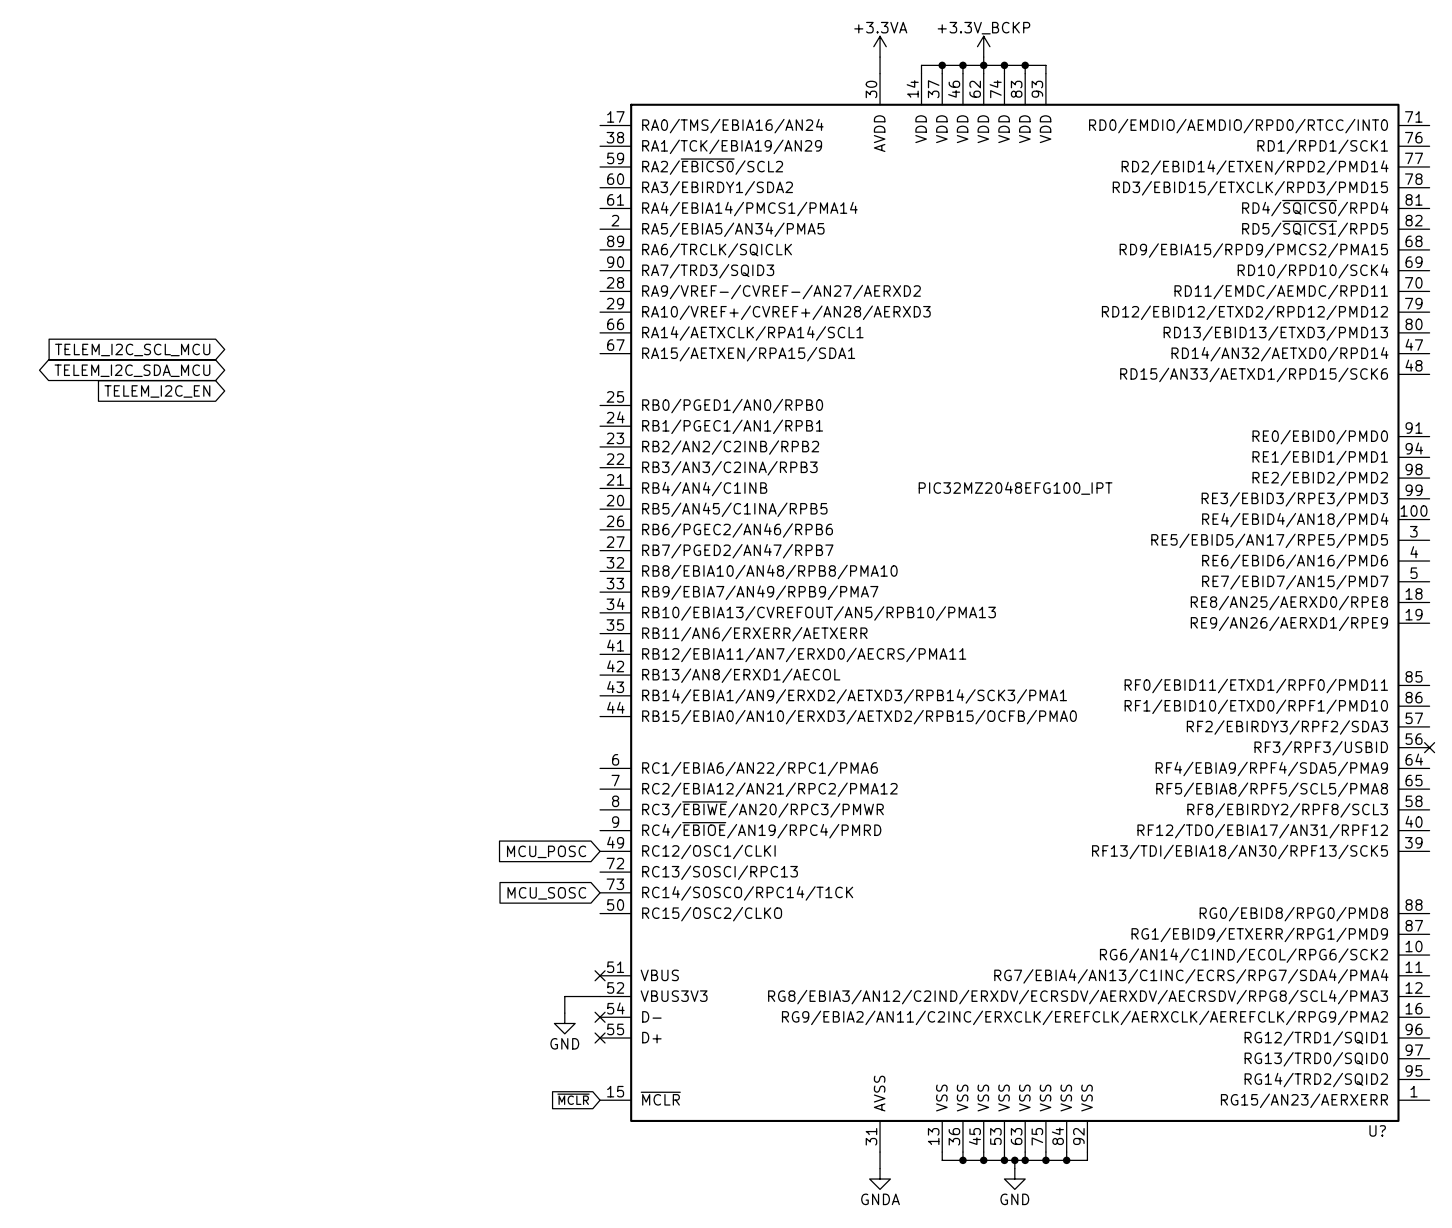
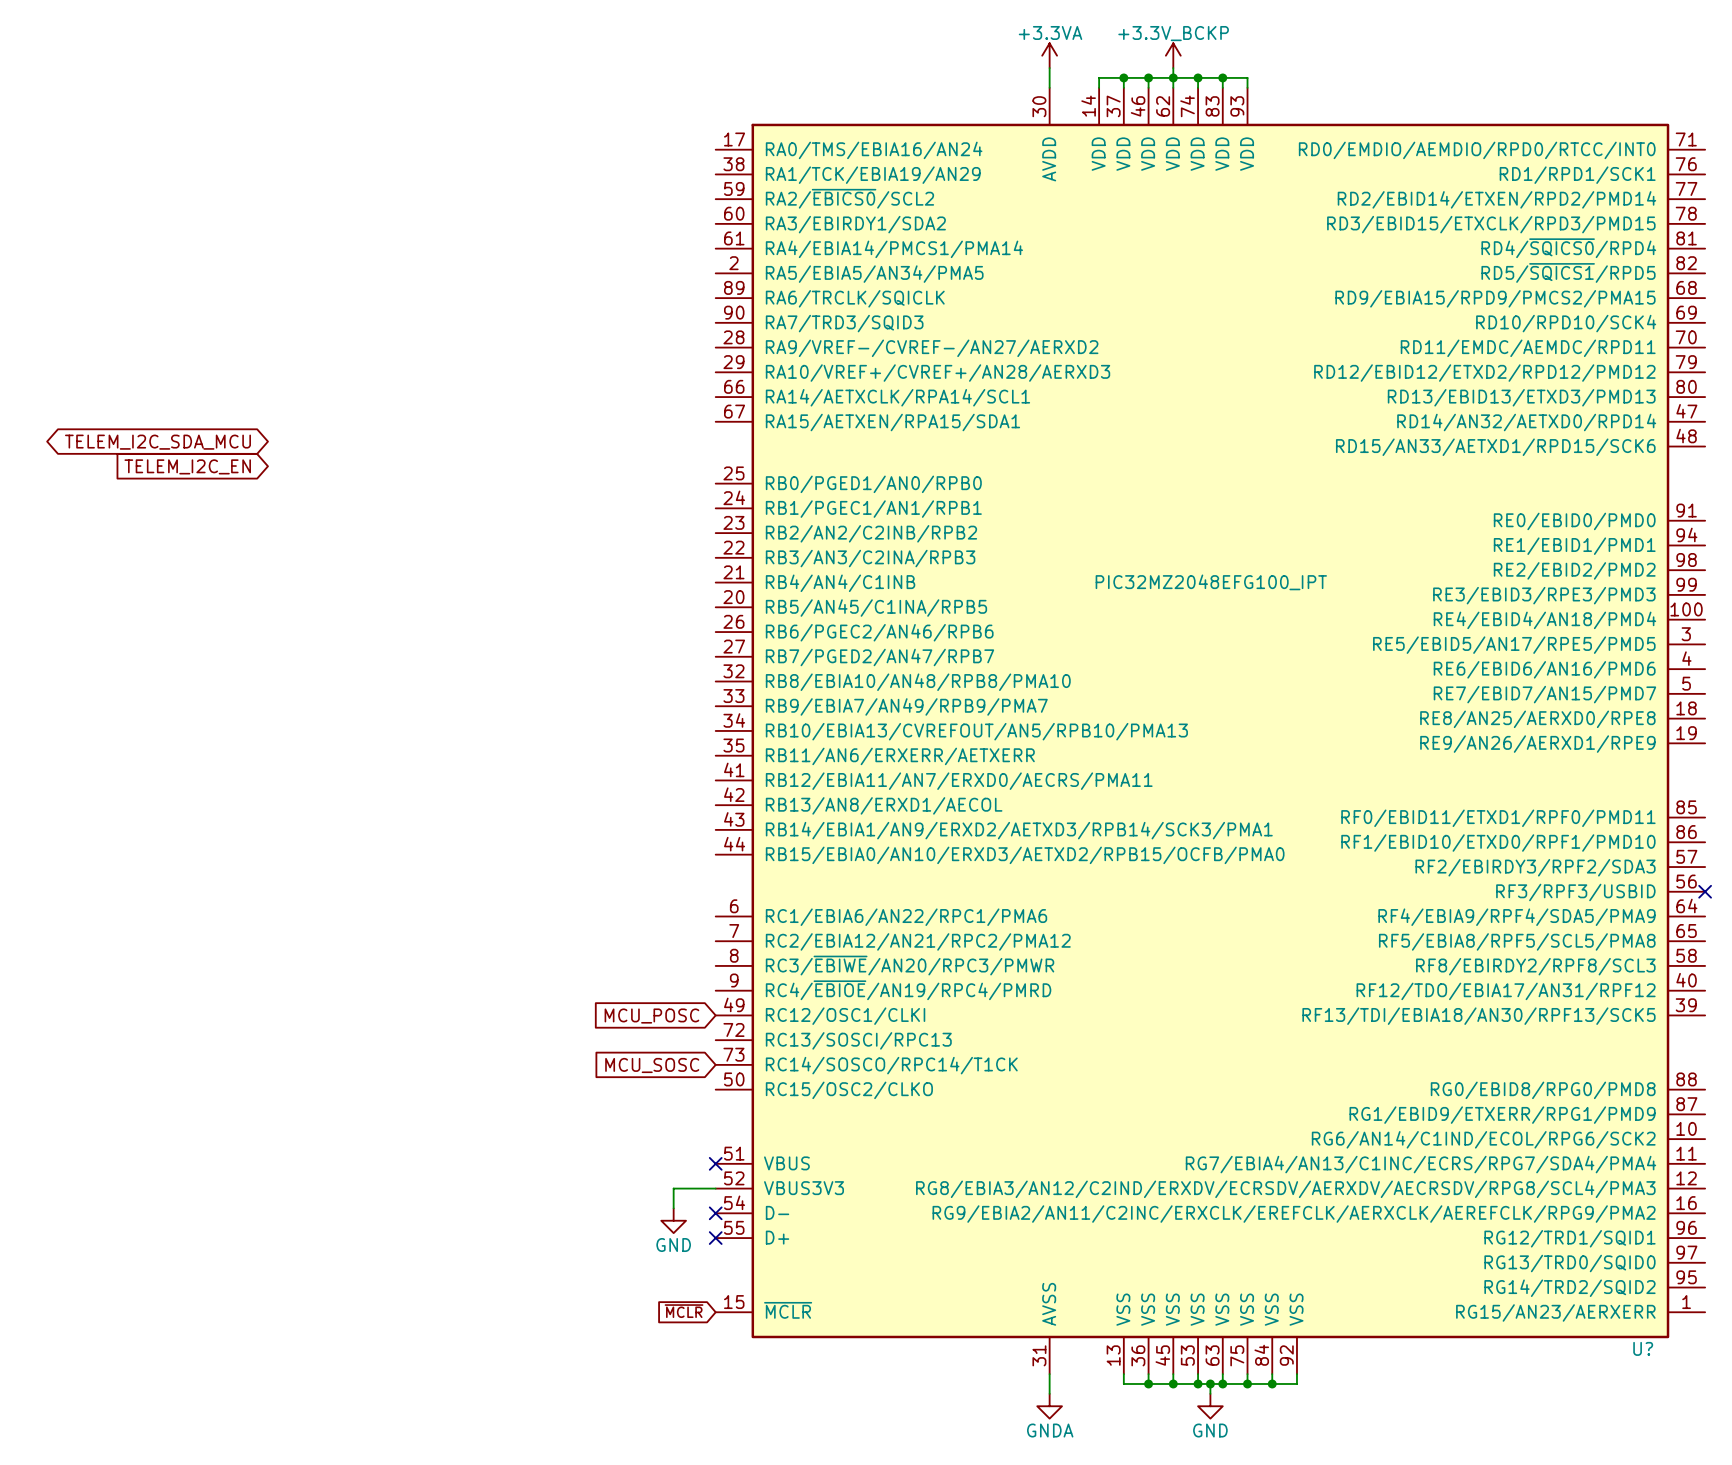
global label: TELEM_I2C_SCL_MCU (132, 349) -> none

